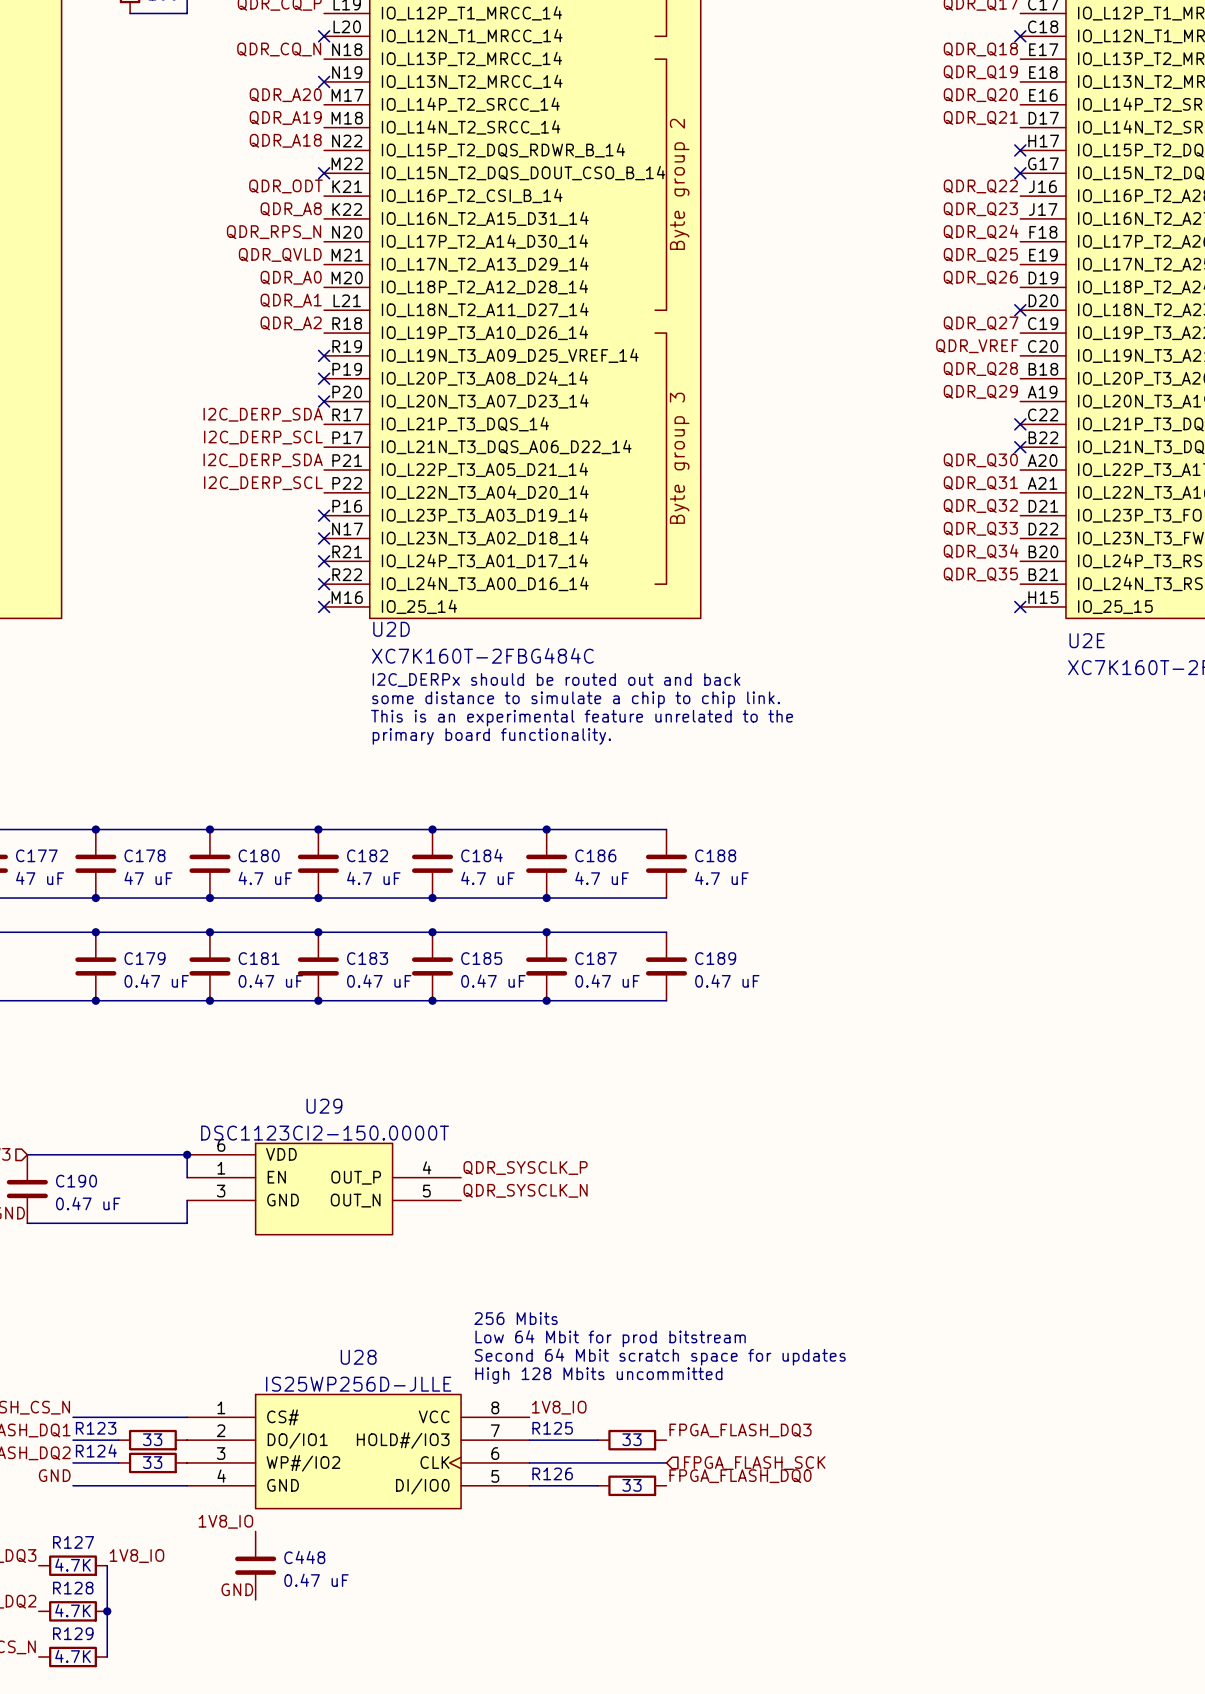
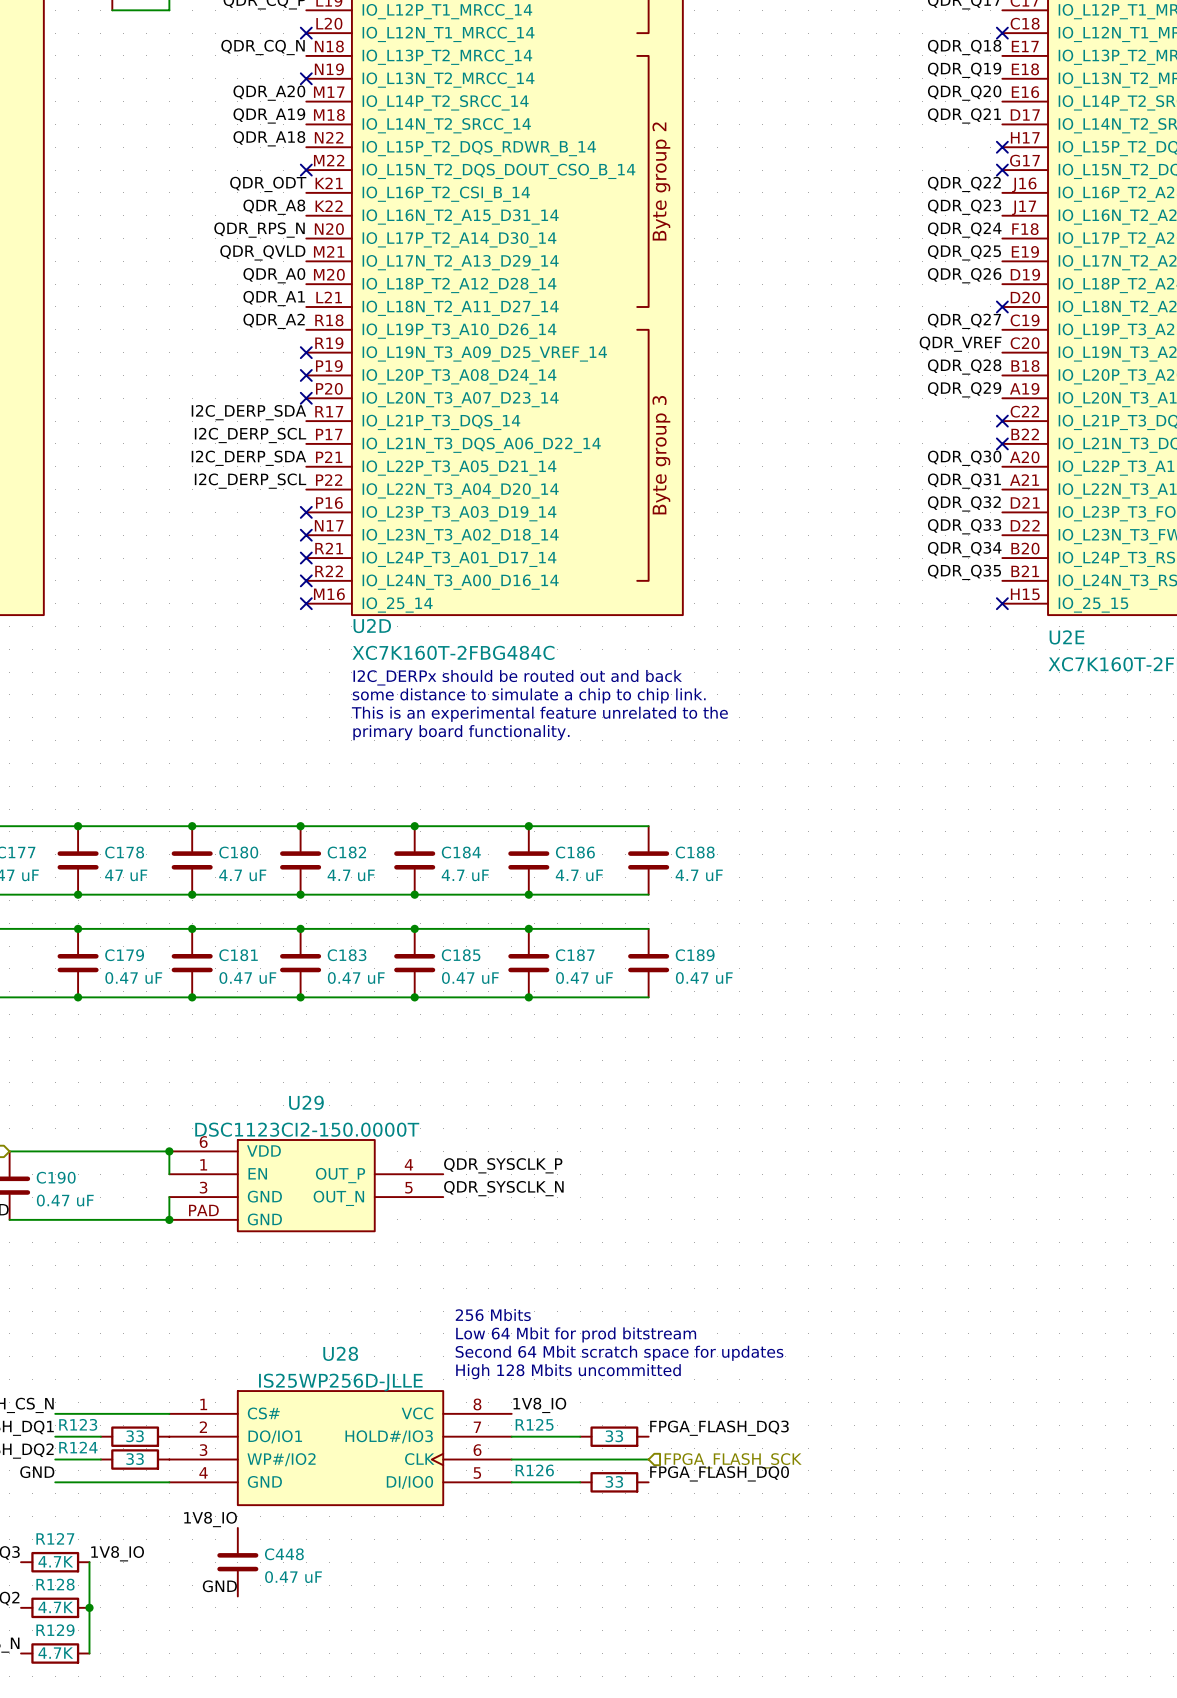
U29 symbol: [187, 1143, 462, 1235] -> [169, 1140, 444, 1232]
junction: none -> (169, 1219)

